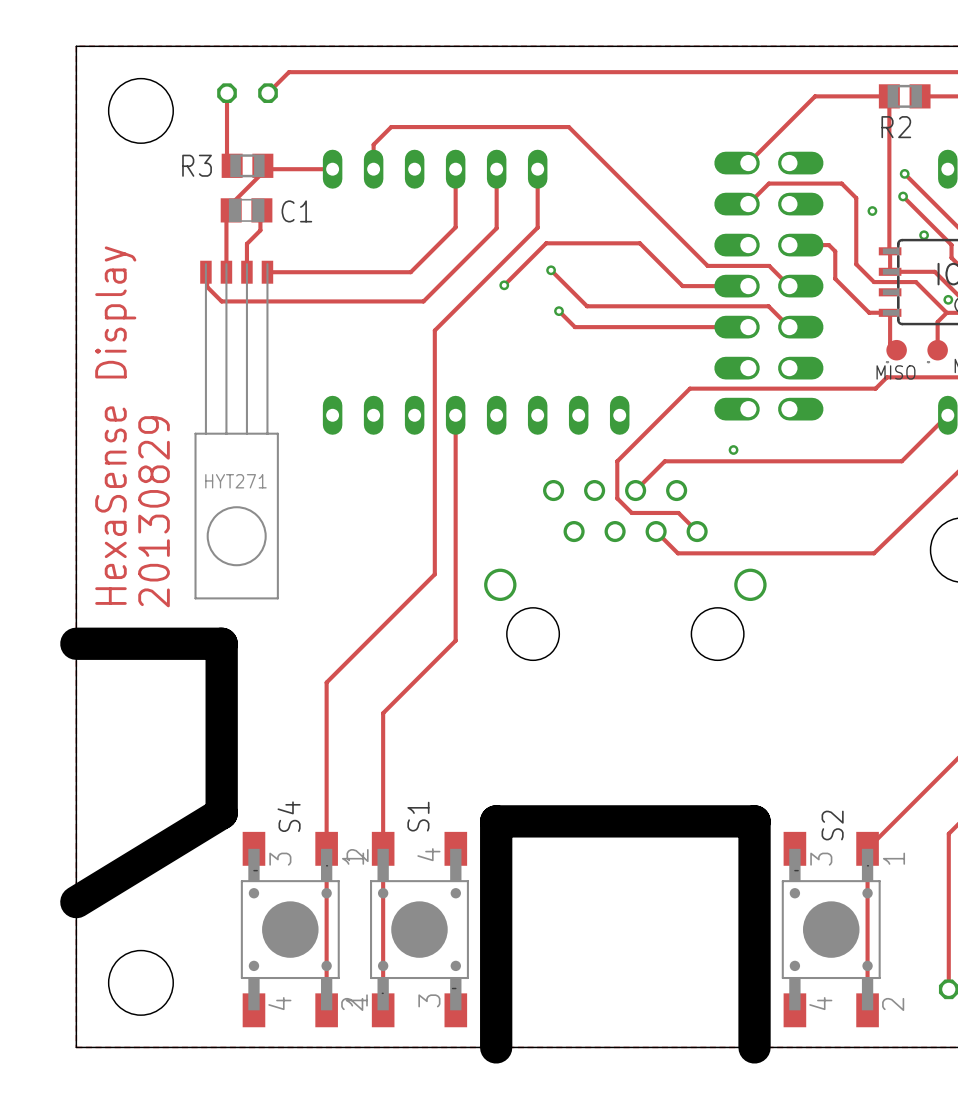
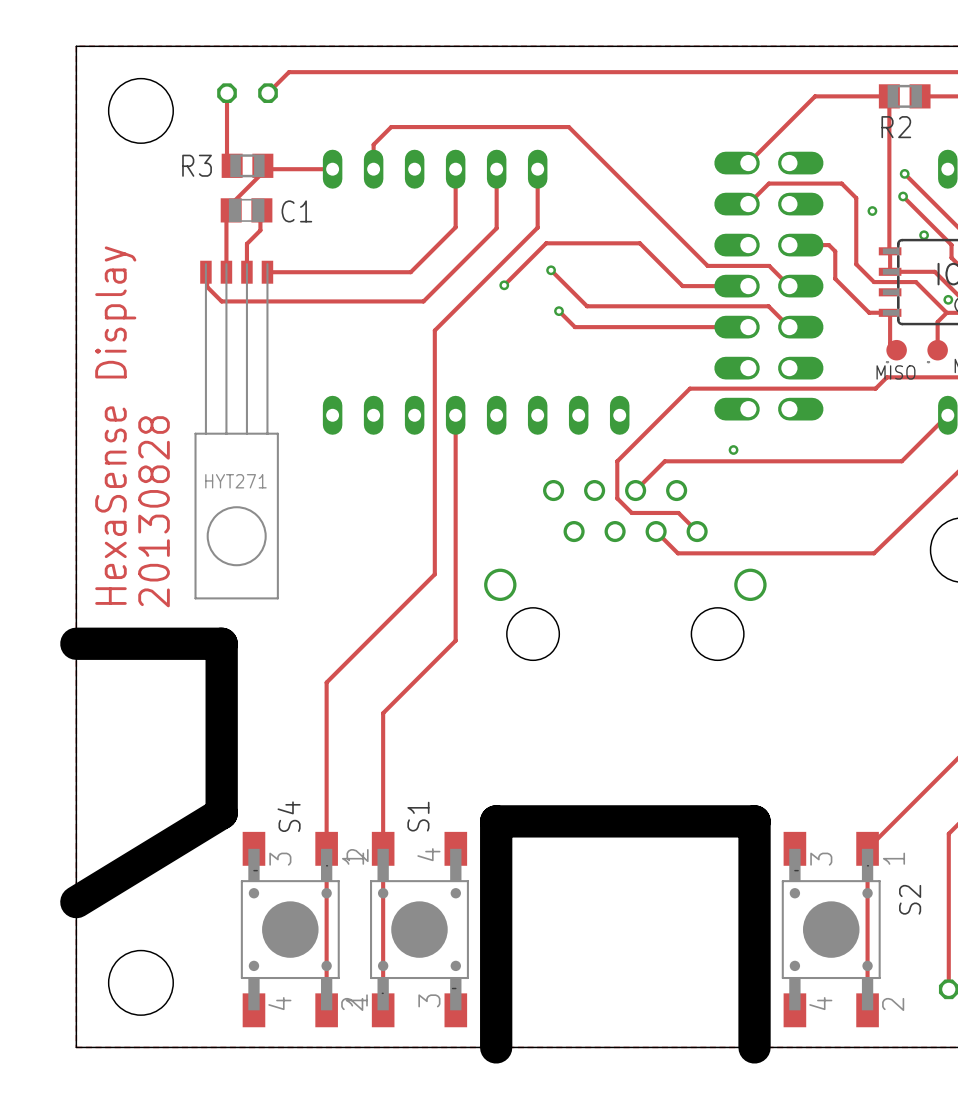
text: 20130829 (154, 511) -> 20130828 (154, 511)
S2 name position: S2 (832, 825) -> S2 (910, 899)

